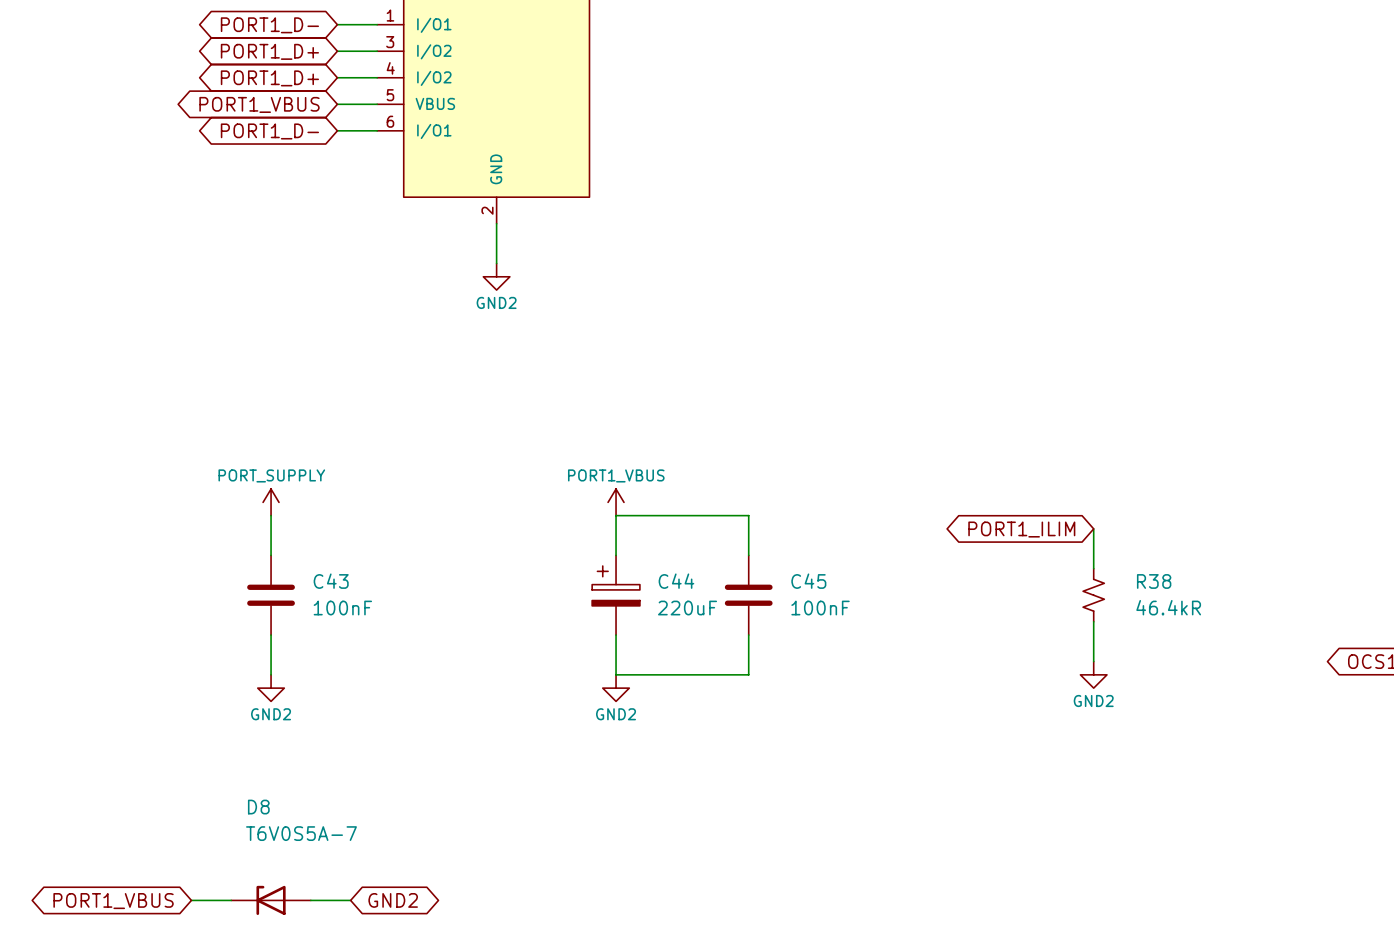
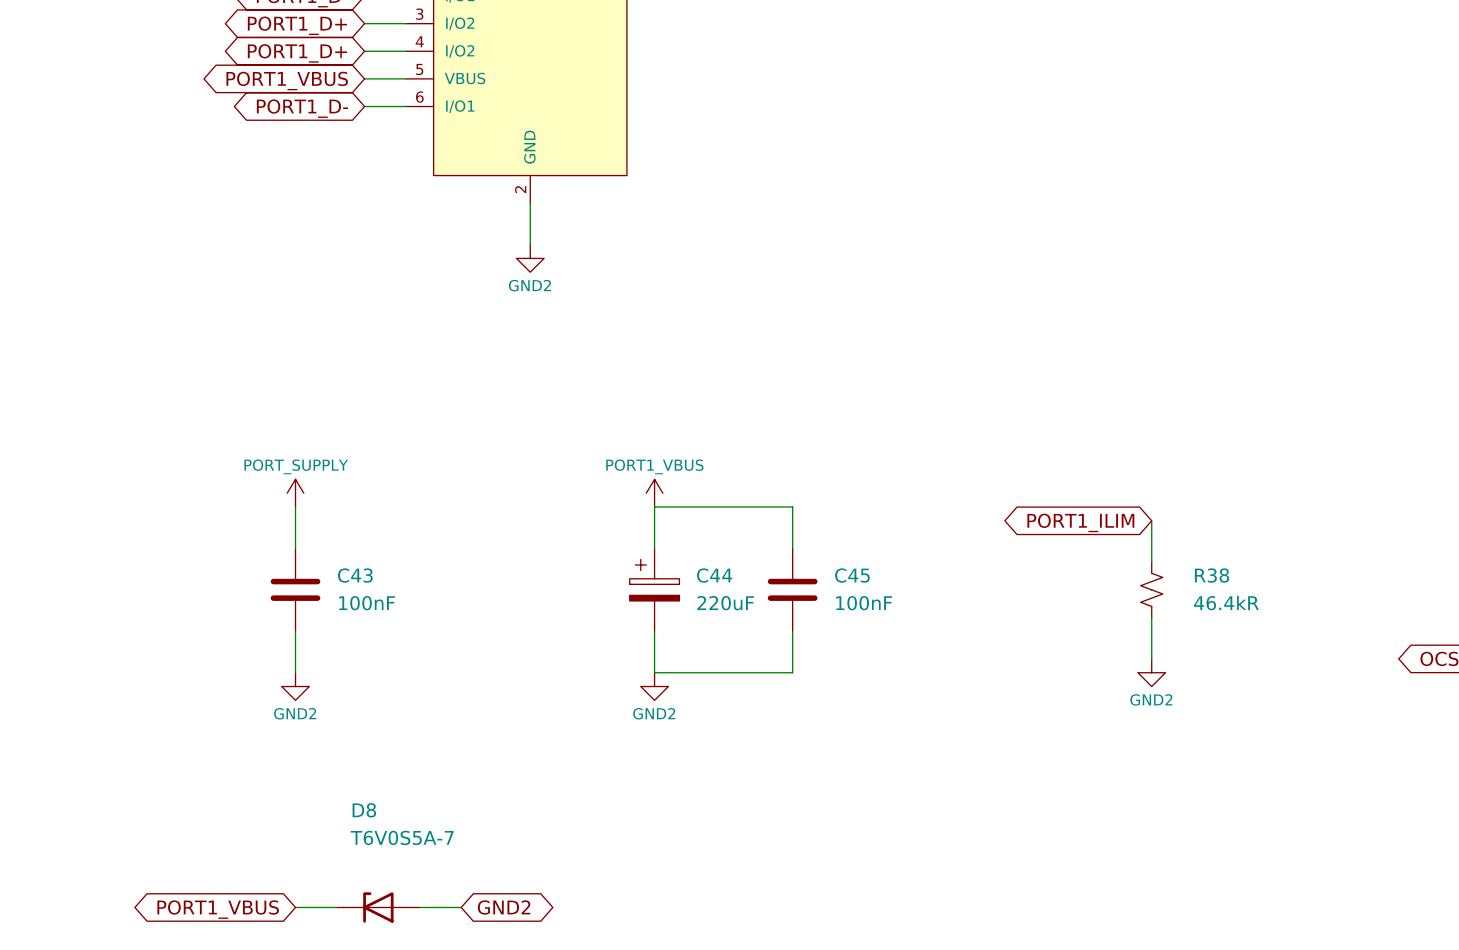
wire: (191, 900) (231, 900) -> (419, 907) (461, 907)
D8 position: (271, 900) -> (378, 907)
global label position: GND2 (393, 900) -> GND2 (504, 907)
global label position: PORT1_VBUS (113, 901) -> PORT1_VBUS (218, 909)

